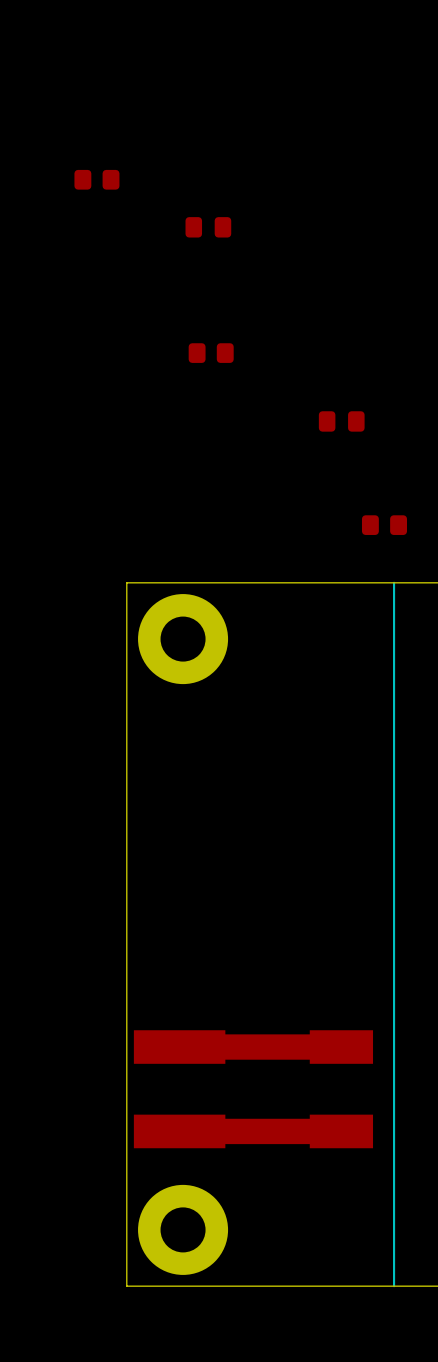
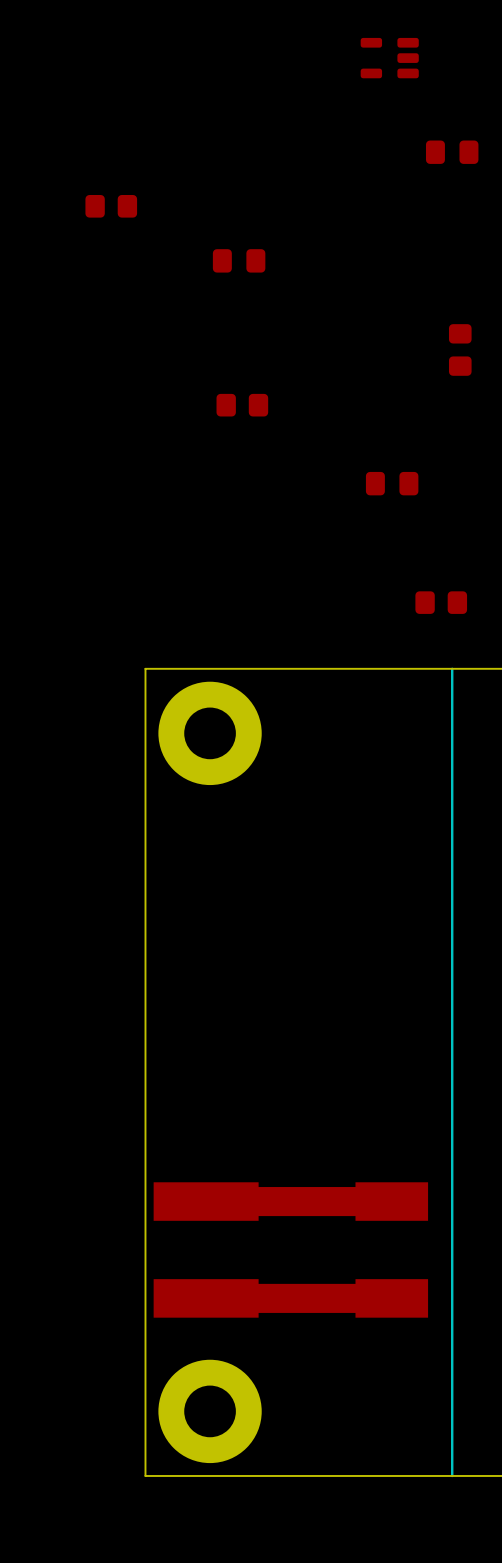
part: none -> (389, 58)
part: none -> (452, 152)
part: none -> (460, 349)

